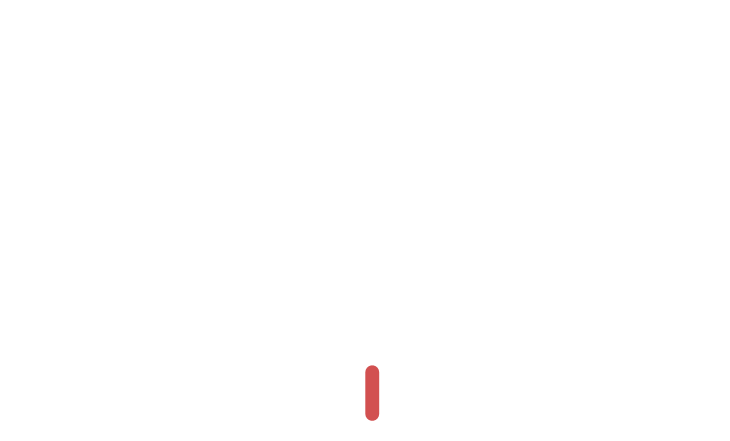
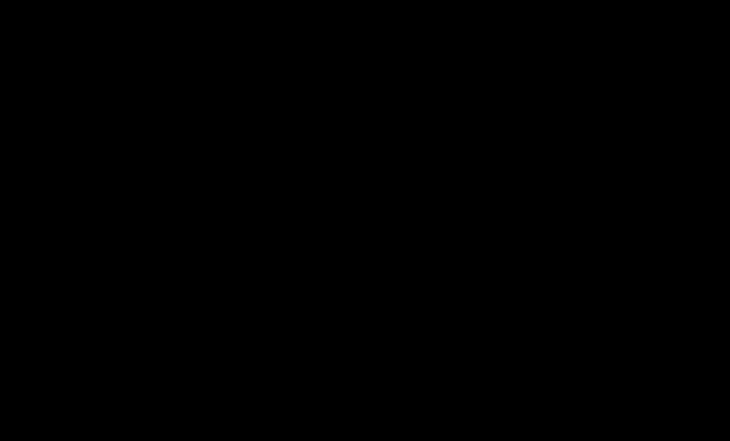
top track: (372, 372) (372, 413) -> none

